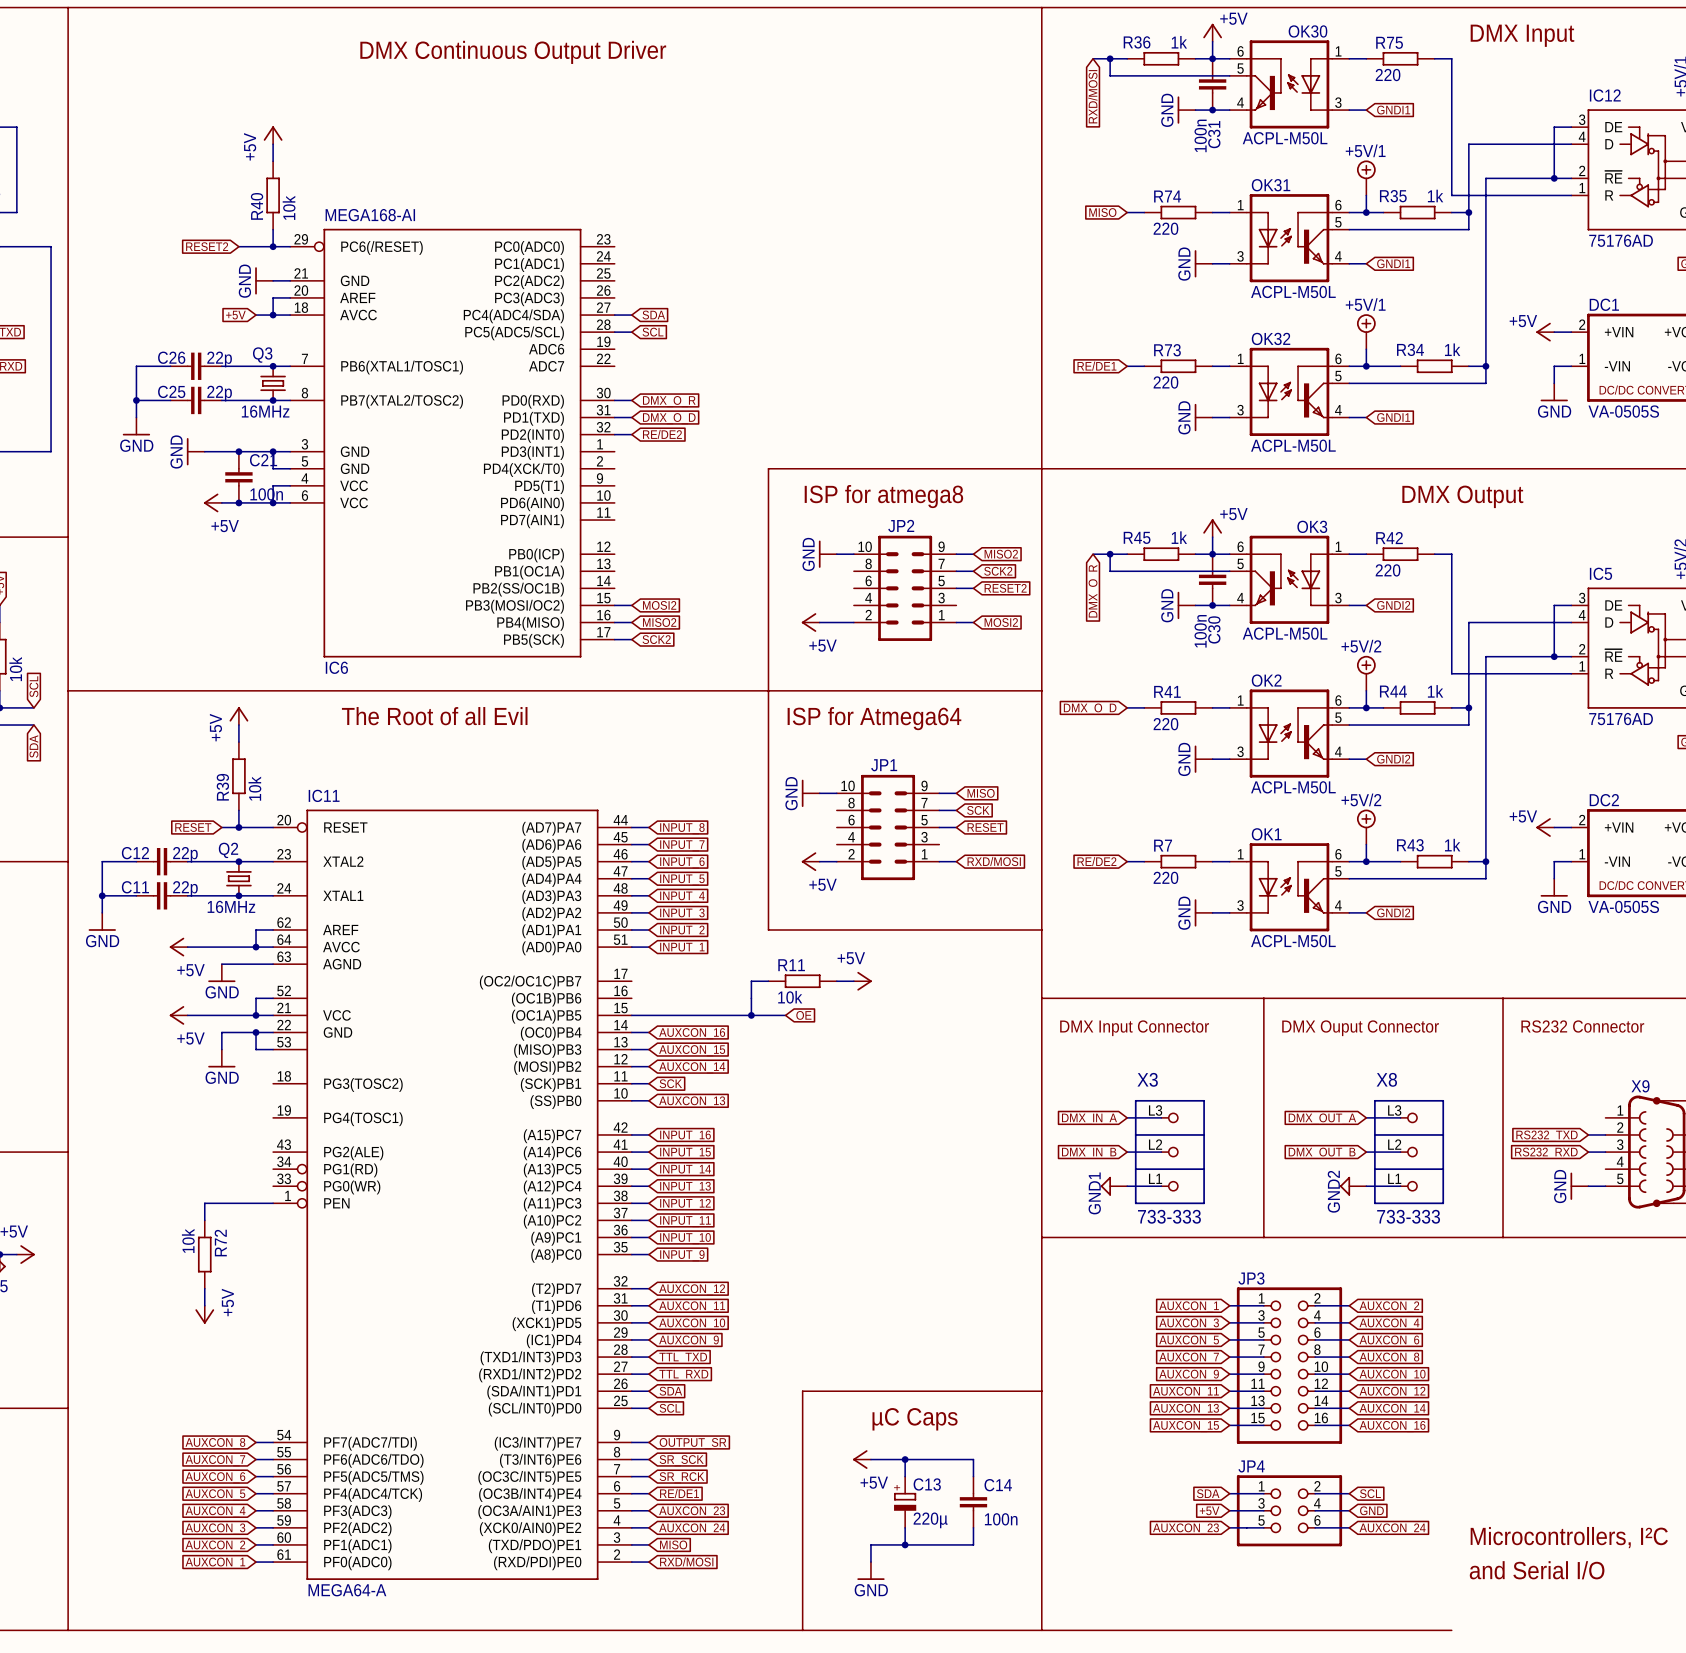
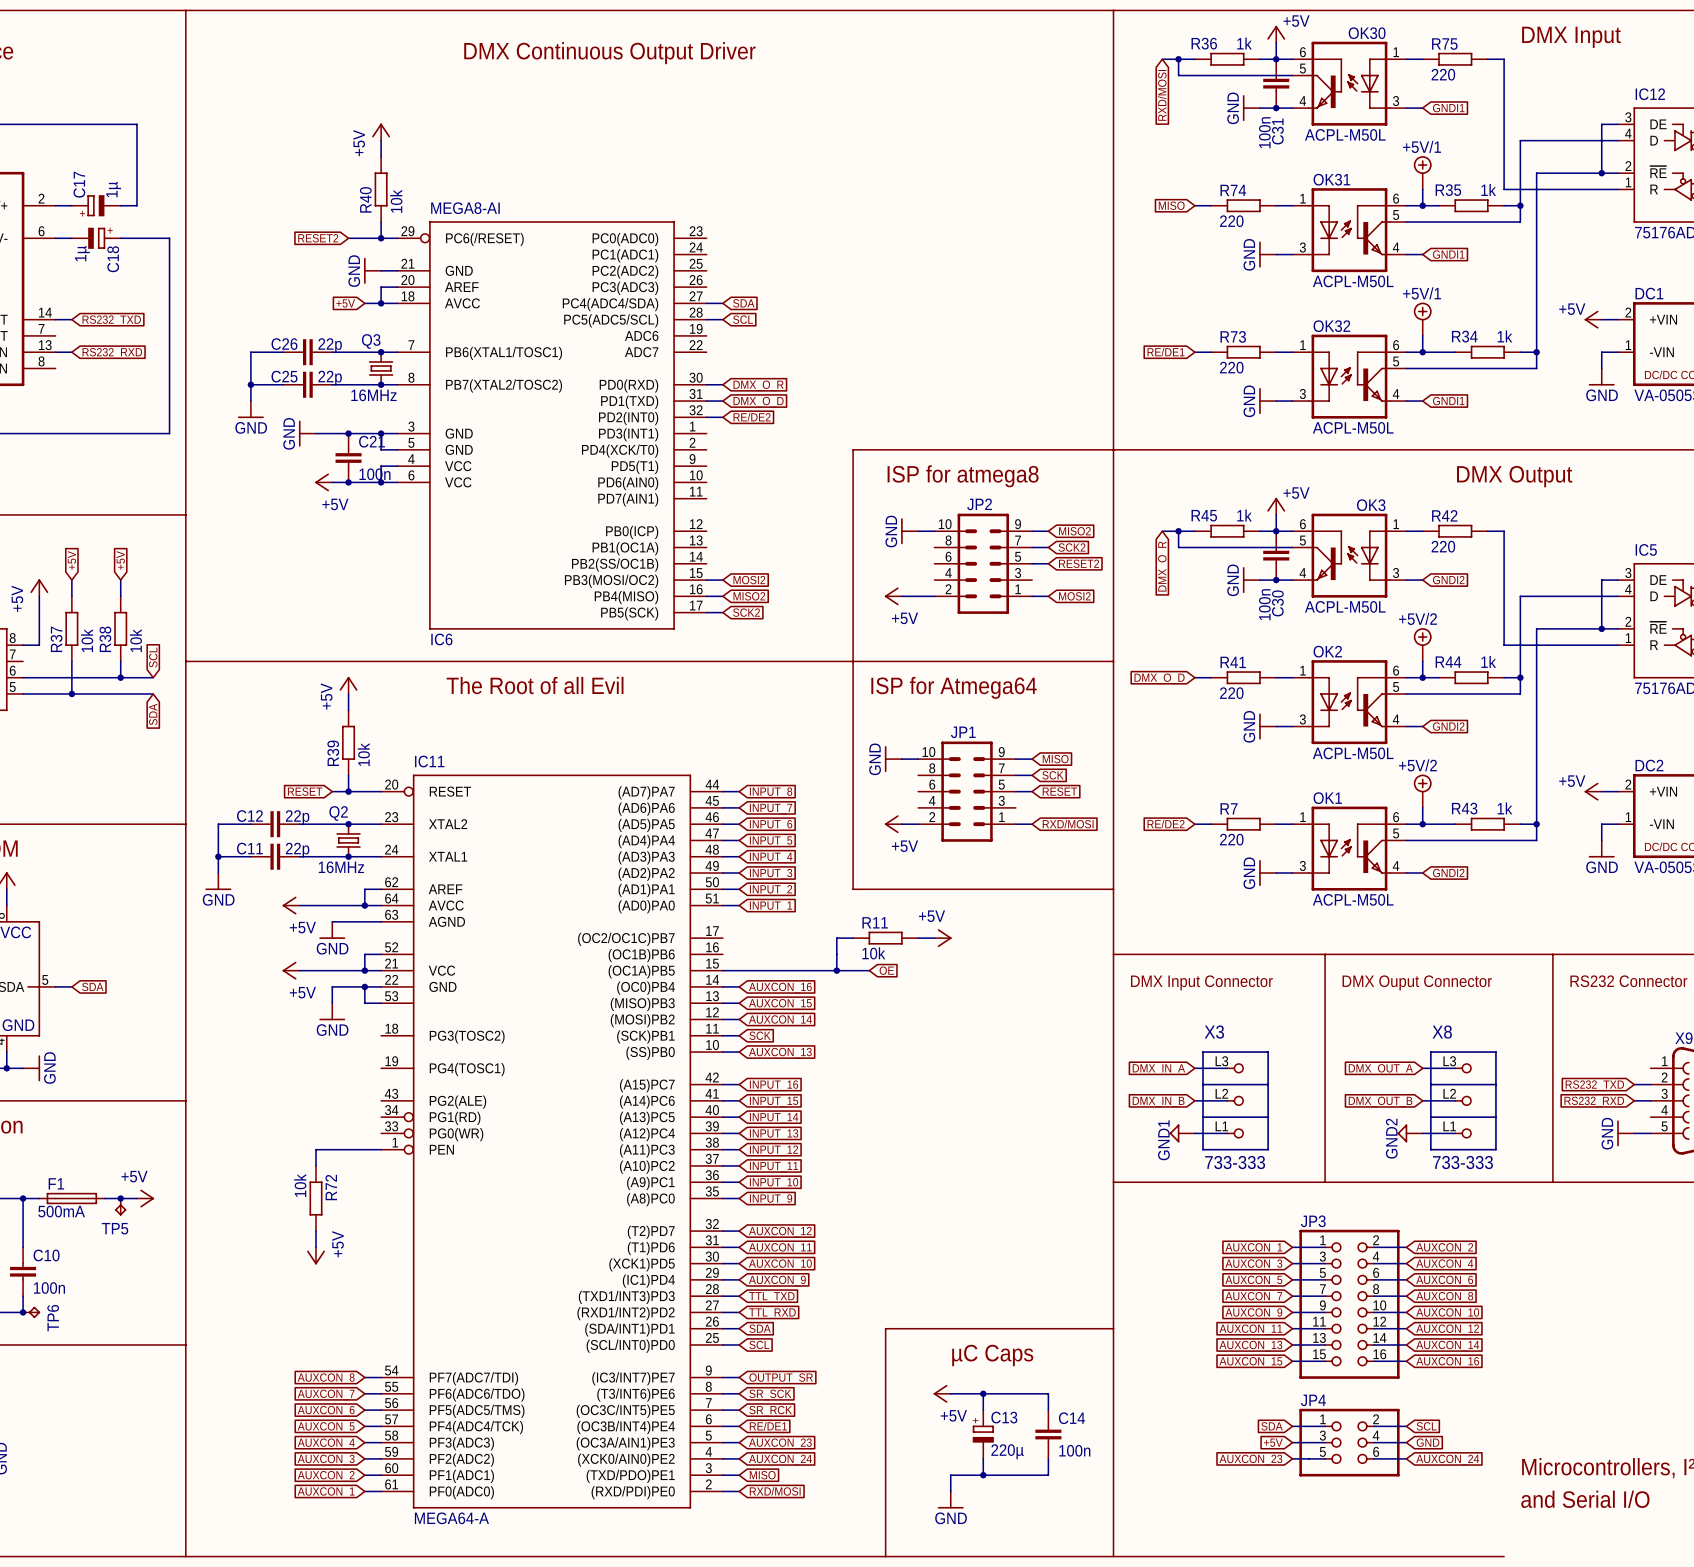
IC6 value: MEGA168-AI (370, 215) -> MEGA8-AI (465, 208)

